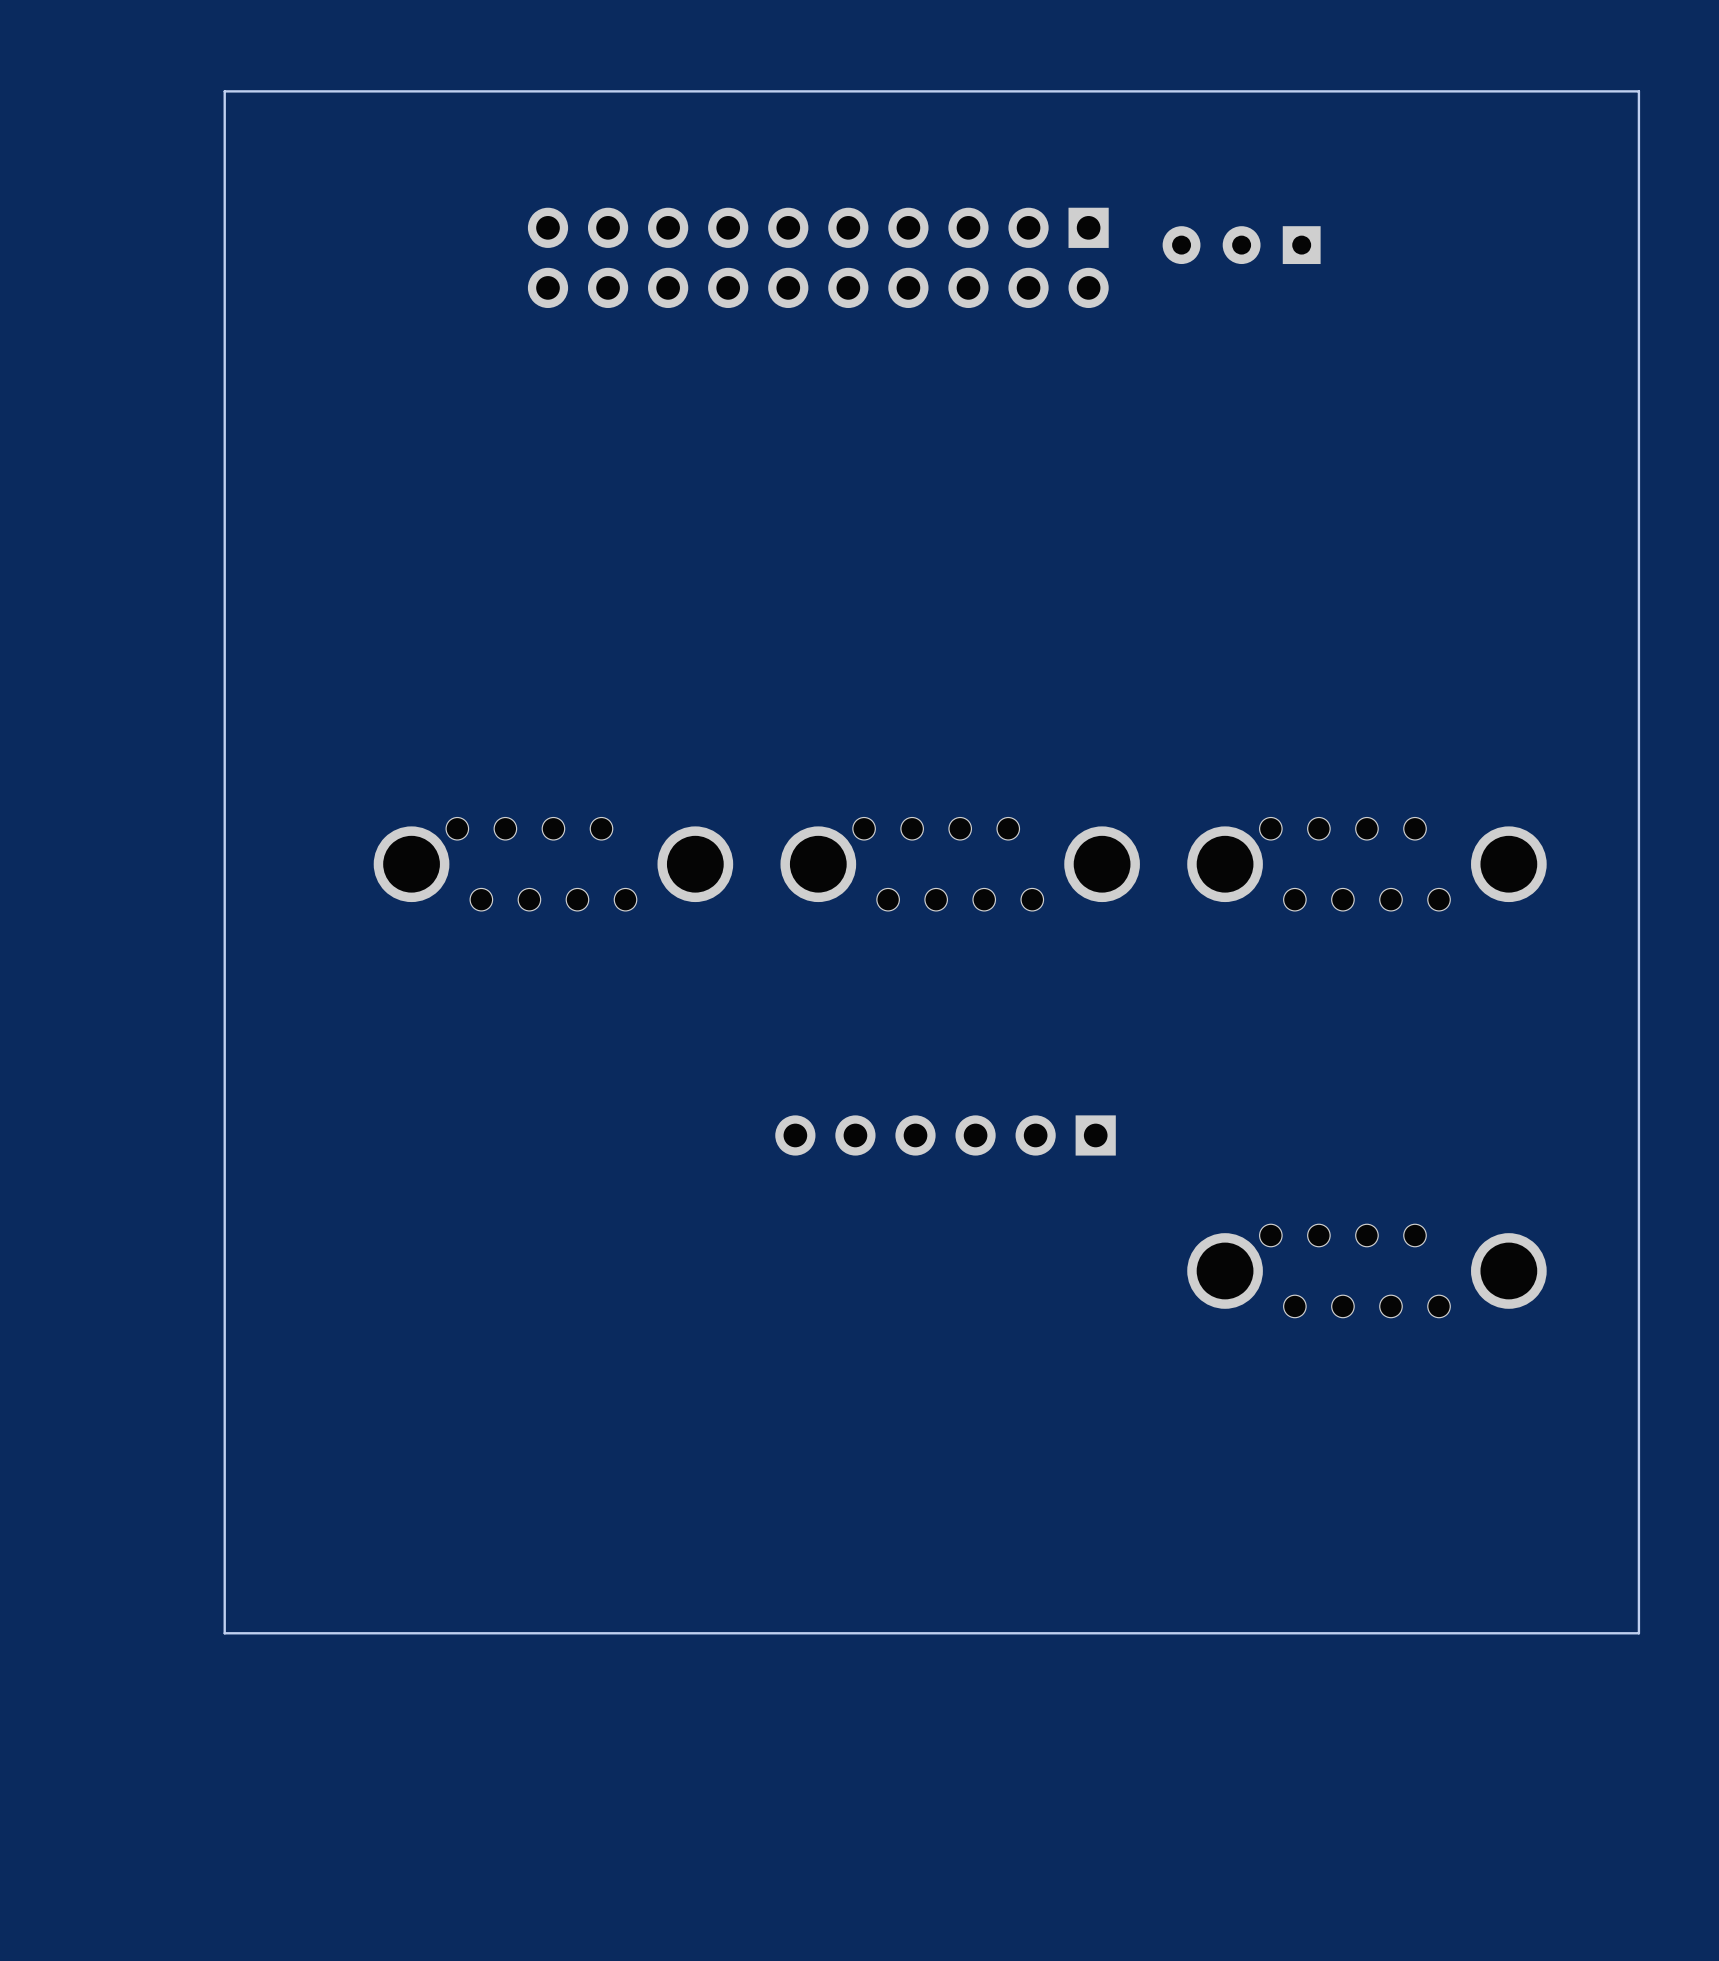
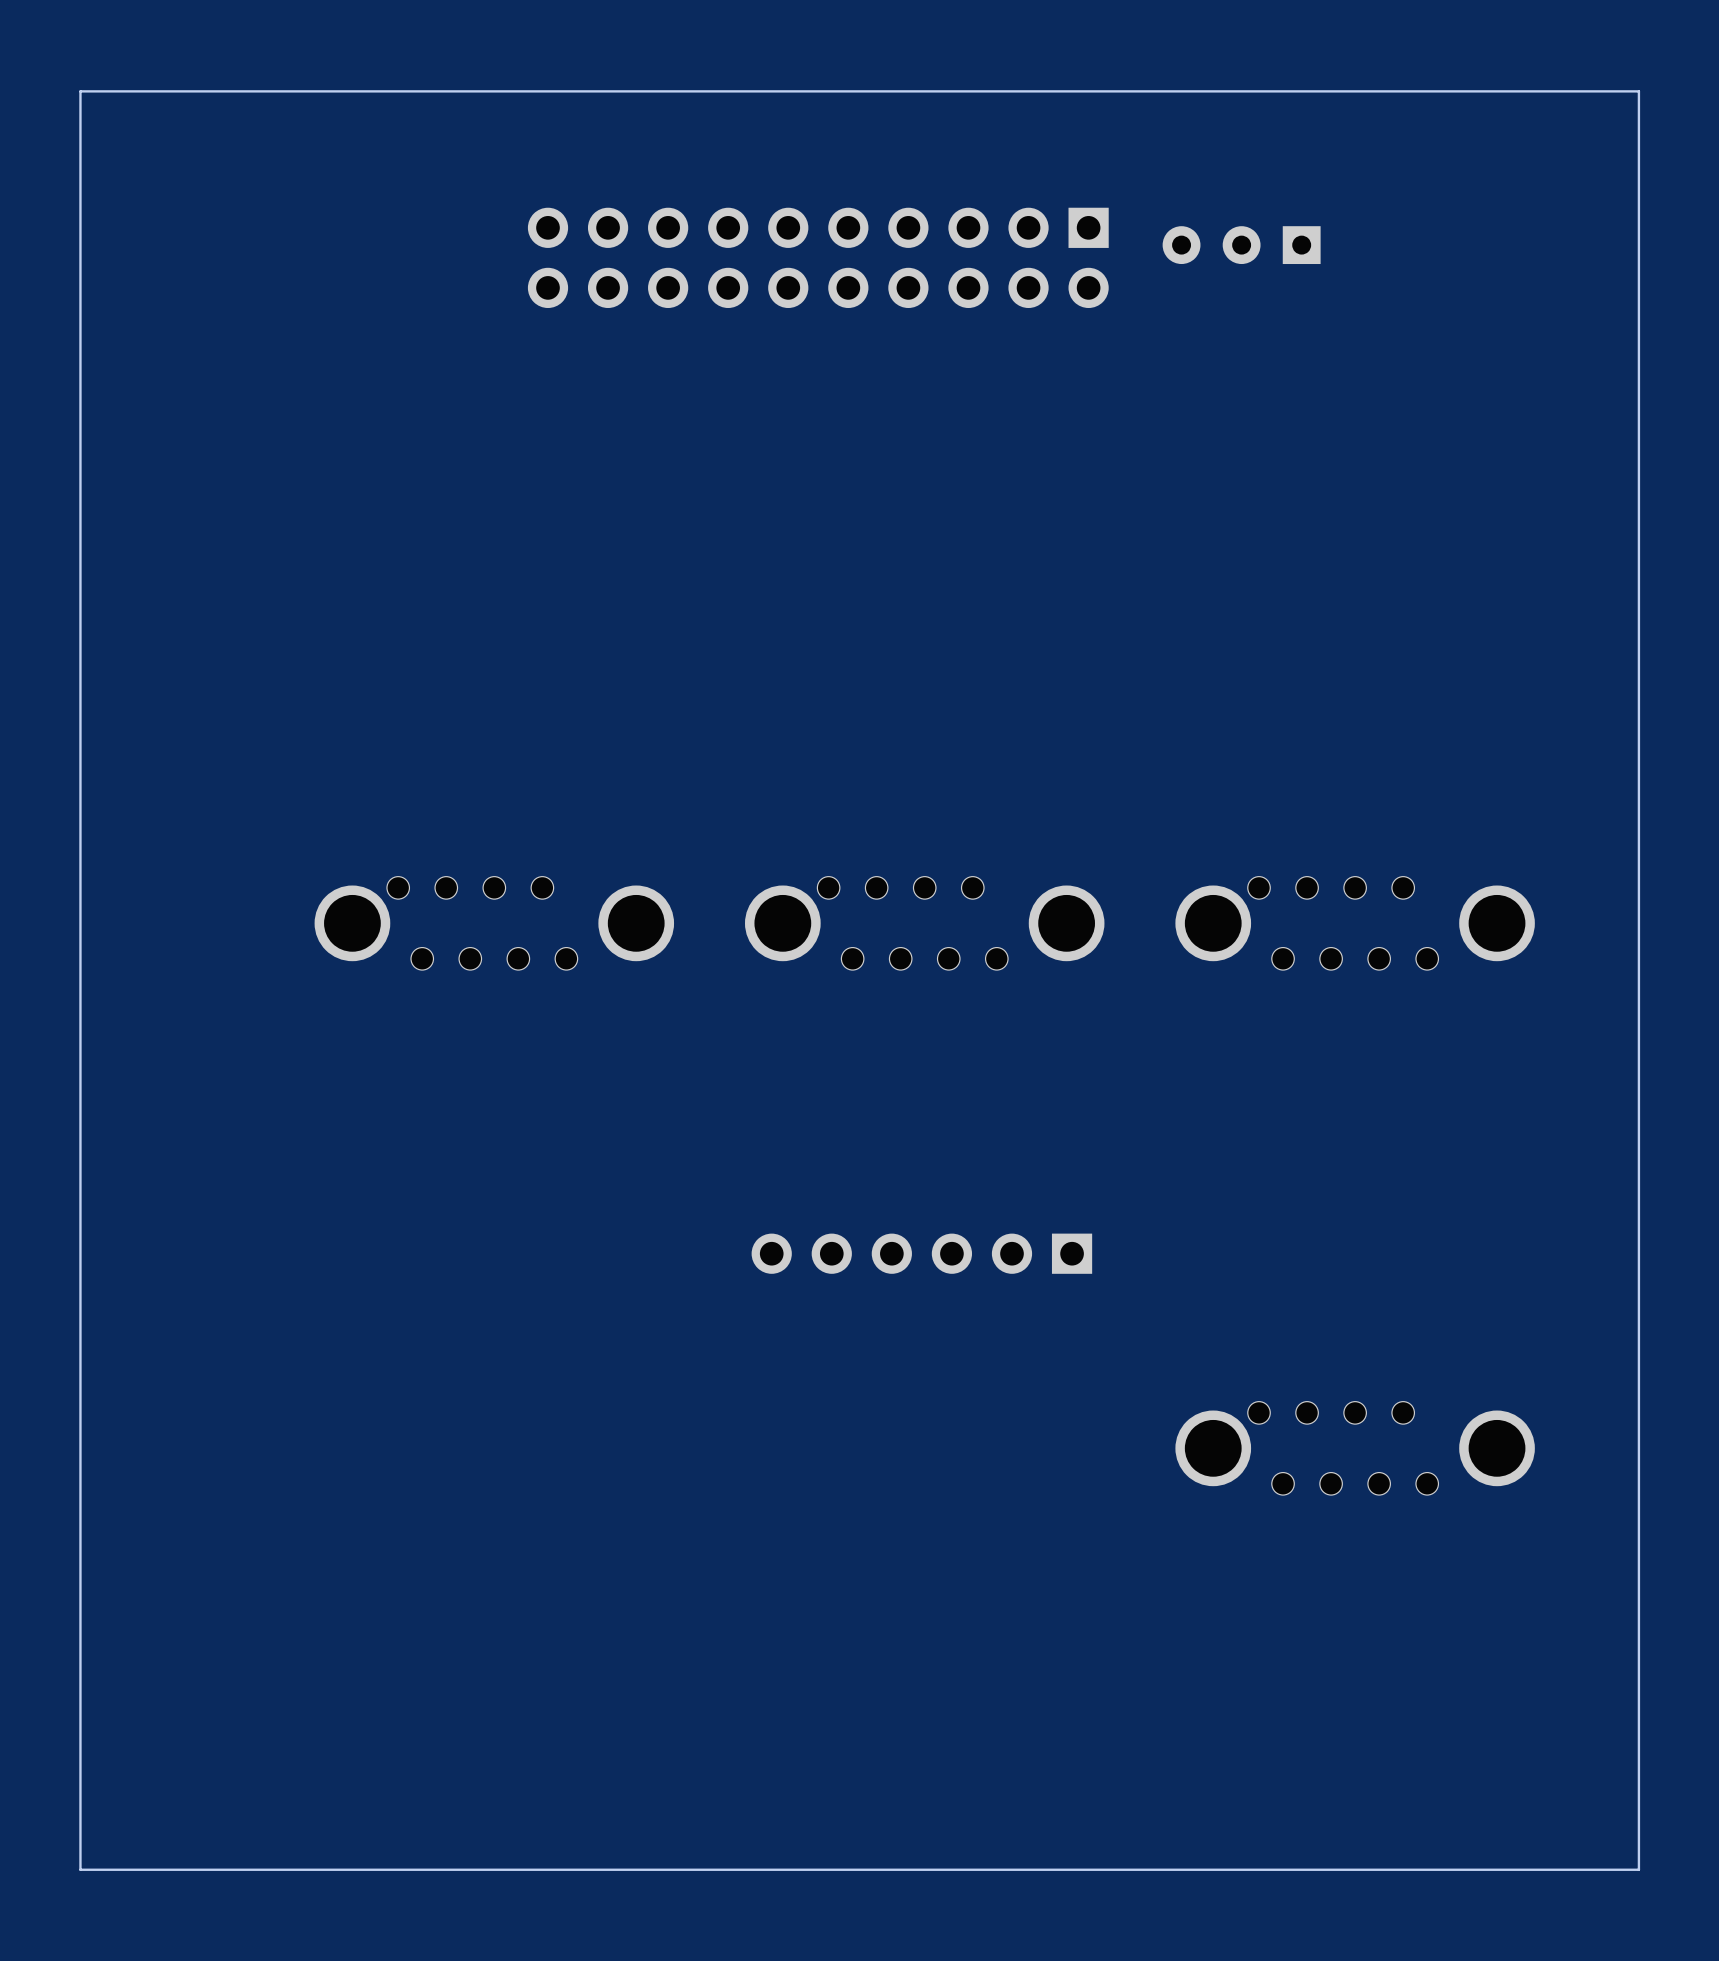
board edge: (224, 91) (224, 1633) (1638, 1633) -> (224, 91) (80, 91) (80, 1869) (1638, 1869) (1638, 1633)
part position: (553, 864) -> (494, 923)
part position: (960, 864) -> (924, 923)
part position: (1366, 864) -> (1355, 923)
part position: (945, 1135) -> (921, 1253)
part: (1366, 1270) -> none
part: none -> (1355, 1448)

